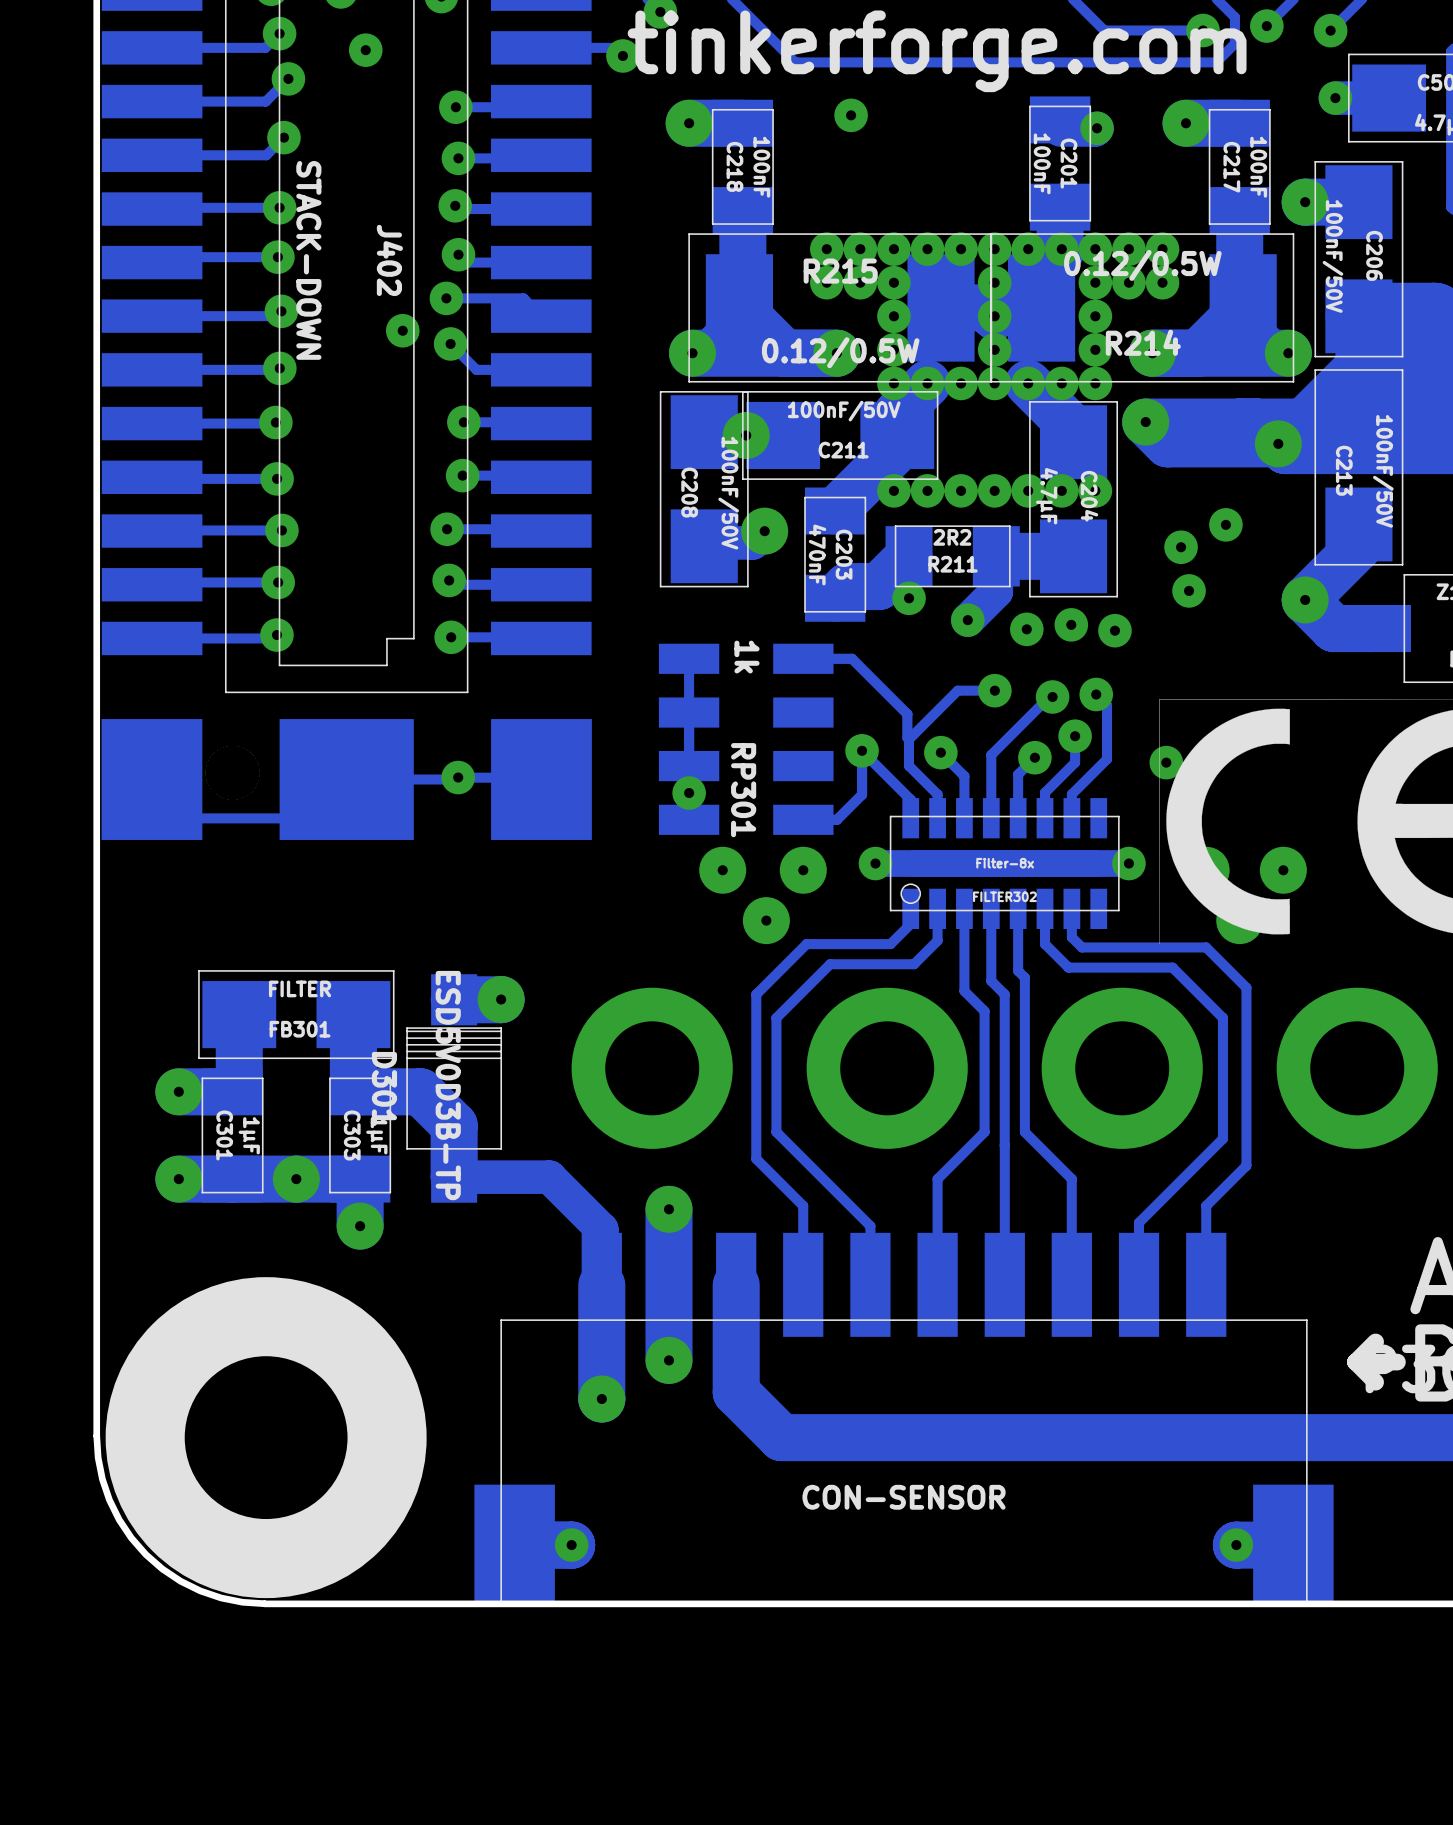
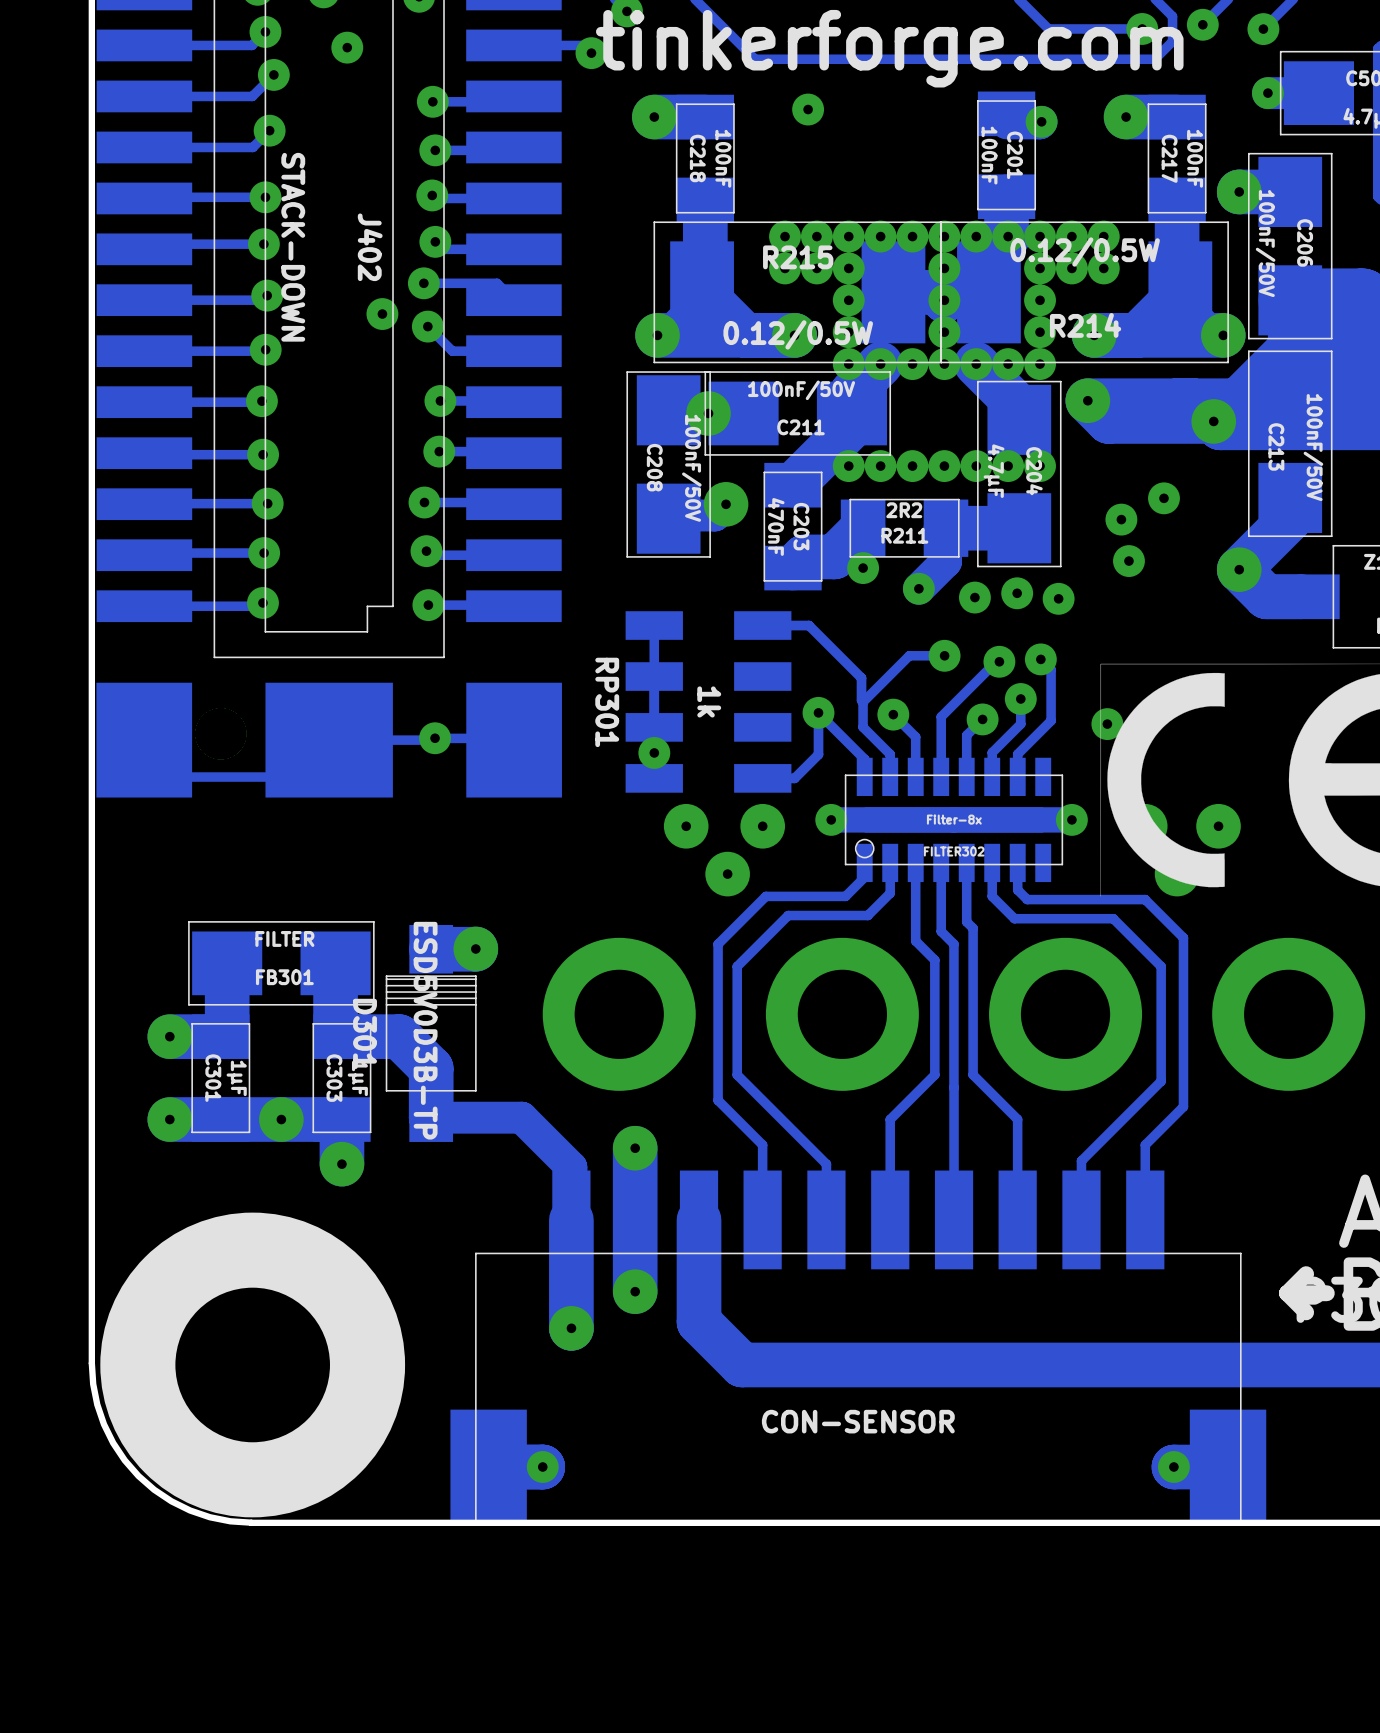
RP301 value position: 1k (746, 657) -> 1k (709, 701)
RP301 name position: RP301 (743, 790) -> RP301 (607, 702)

